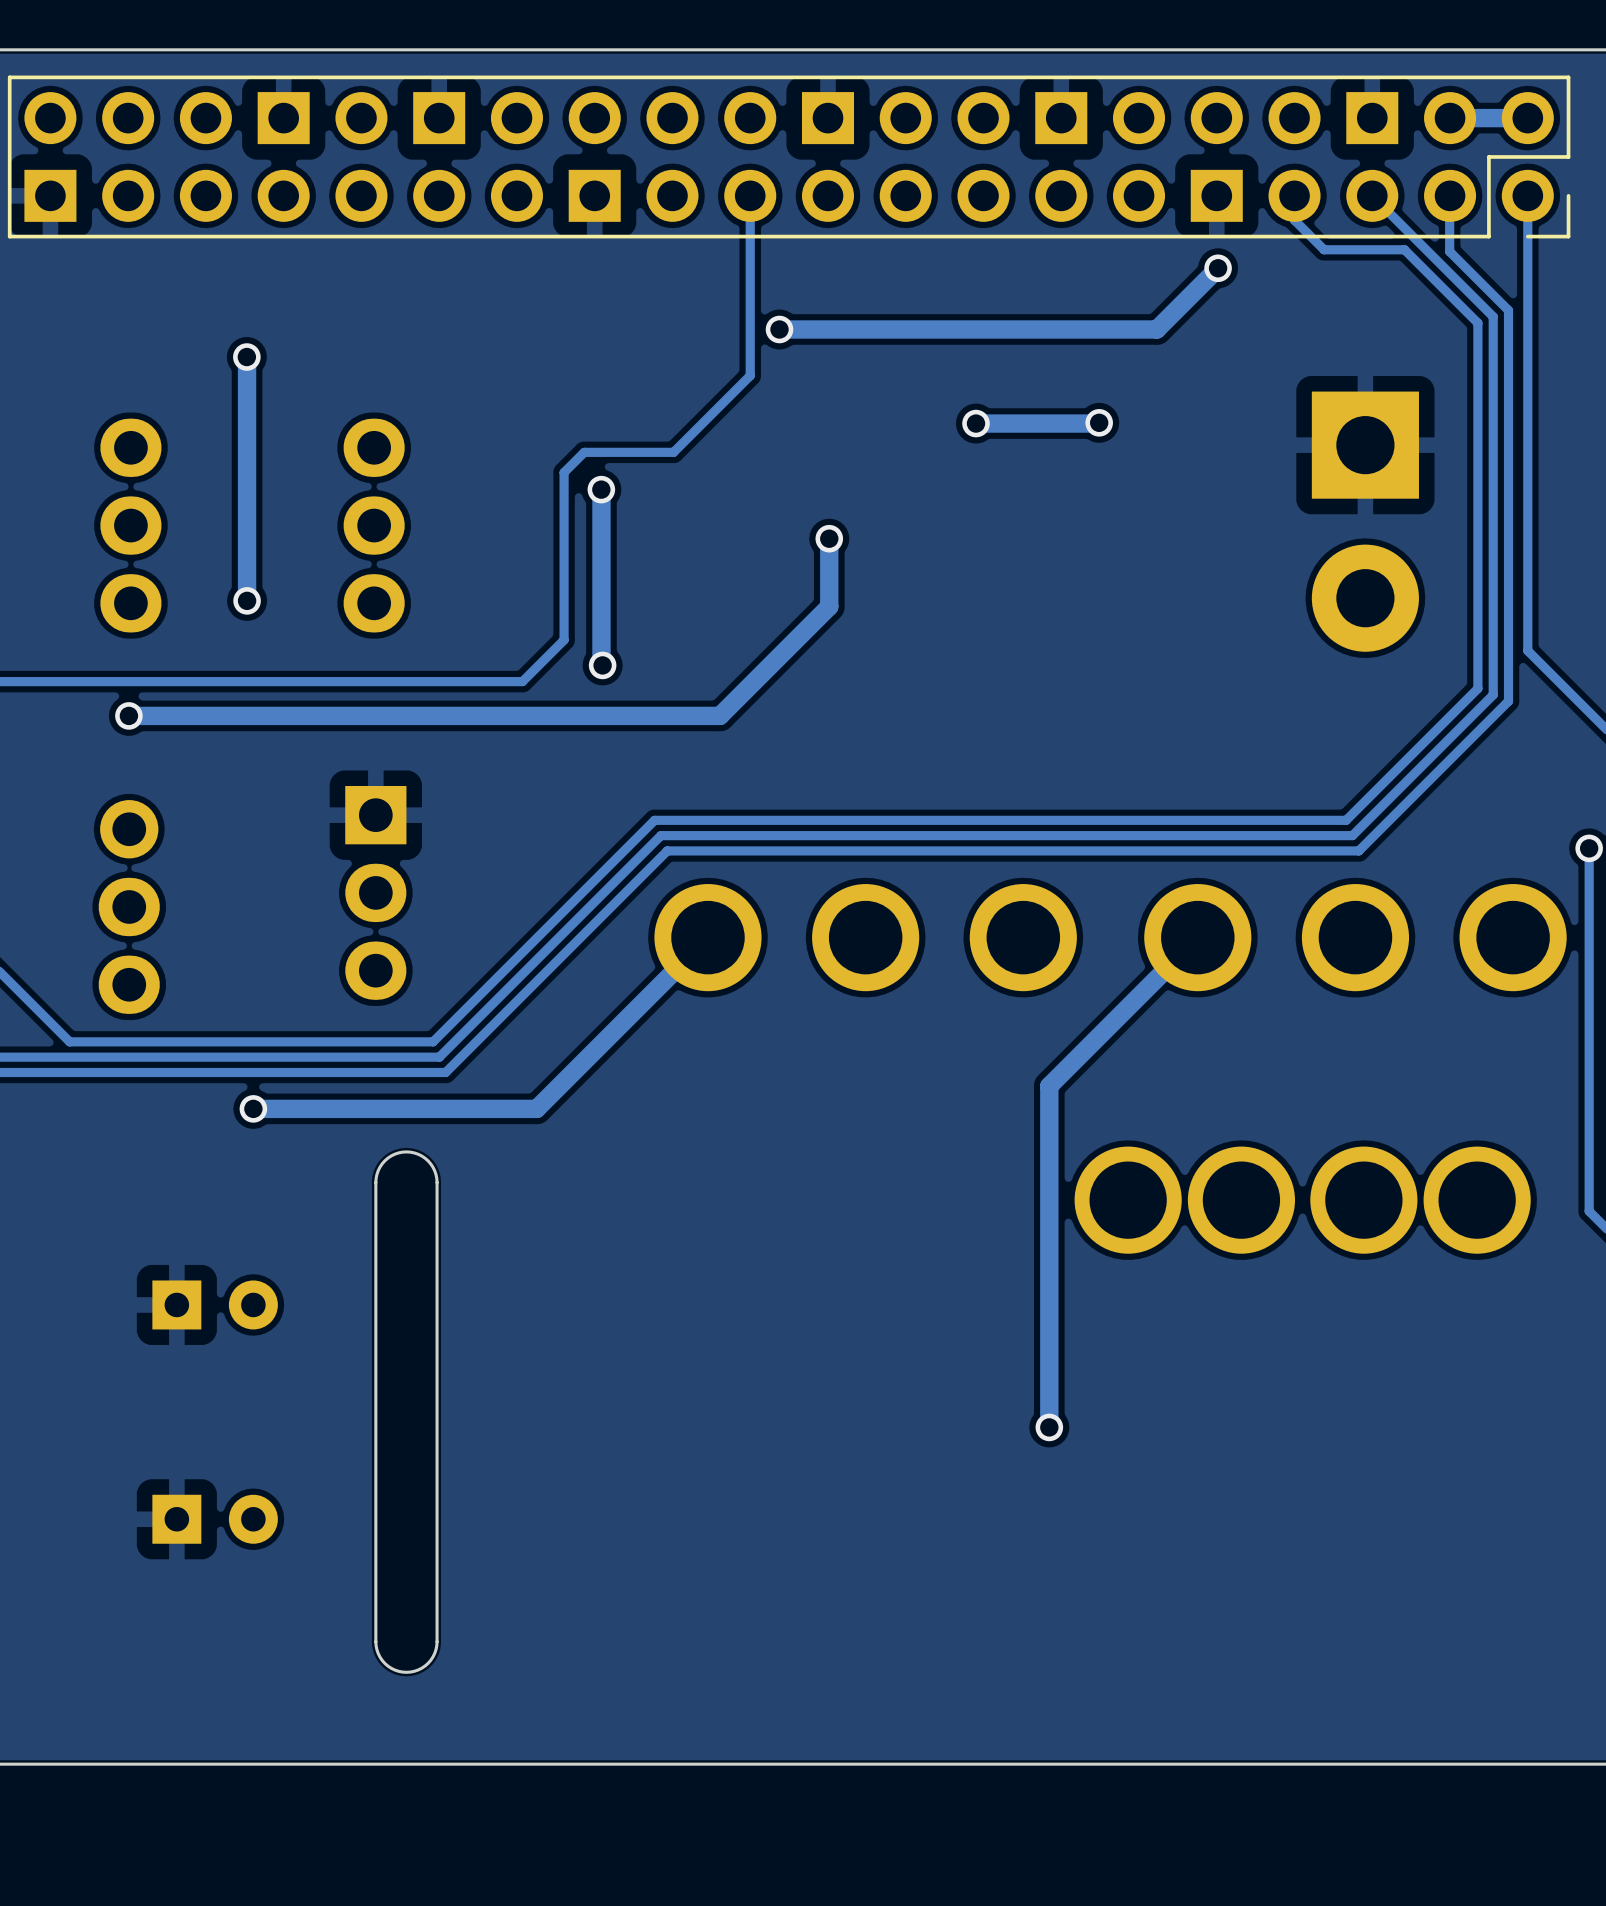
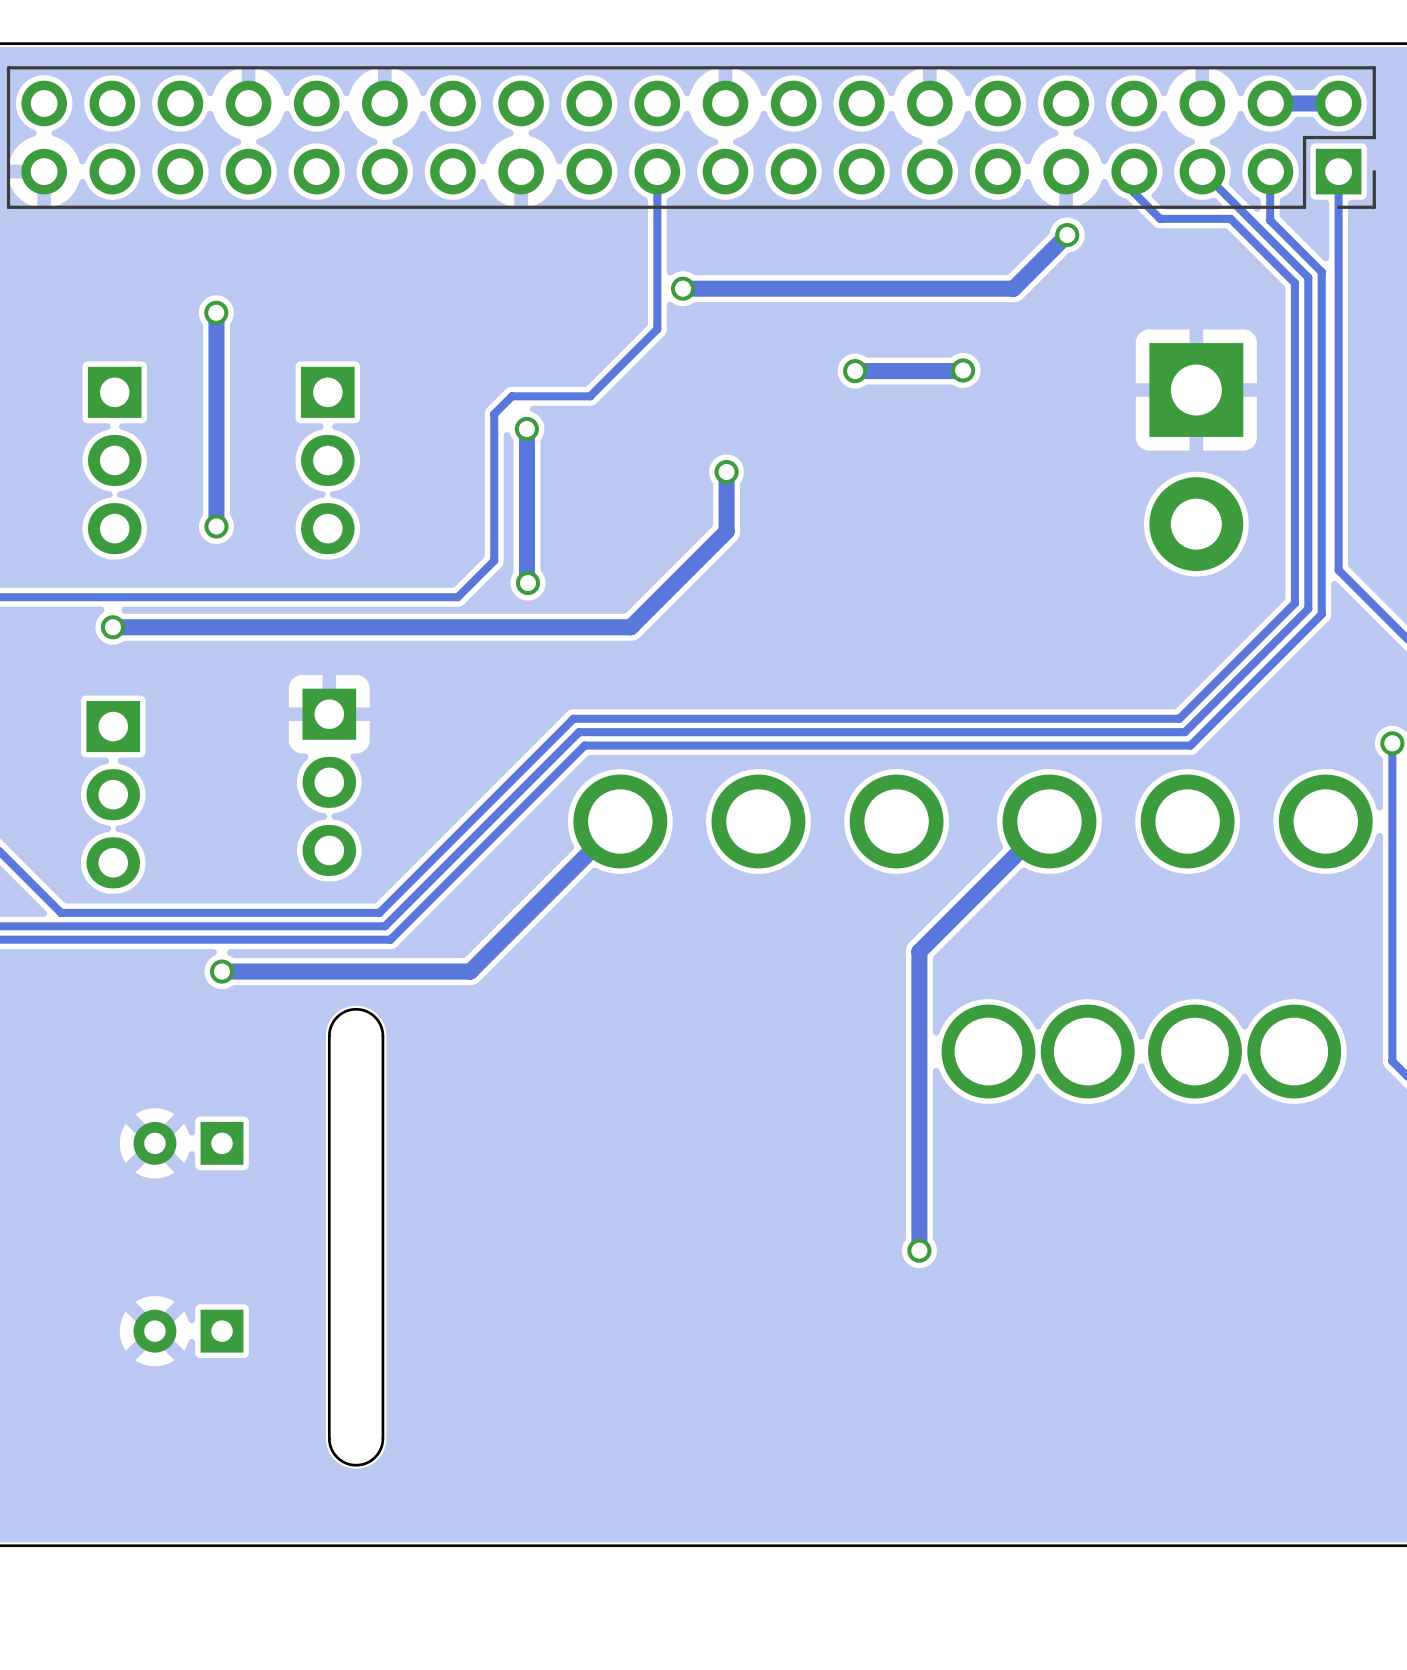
part footprint: [7, 75, 1571, 239] -> [6, 66, 1376, 209]
part footprint: [100, 418, 162, 633] -> [87, 366, 142, 555]
part footprint: [343, 418, 405, 633] -> [301, 366, 355, 555]
part footprint: [98, 800, 160, 1014] -> [86, 701, 141, 889]
part rotation: 0° (215, 1304) -> 180° (188, 1143)
part rotation: 0° (215, 1519) -> 180° (188, 1331)

